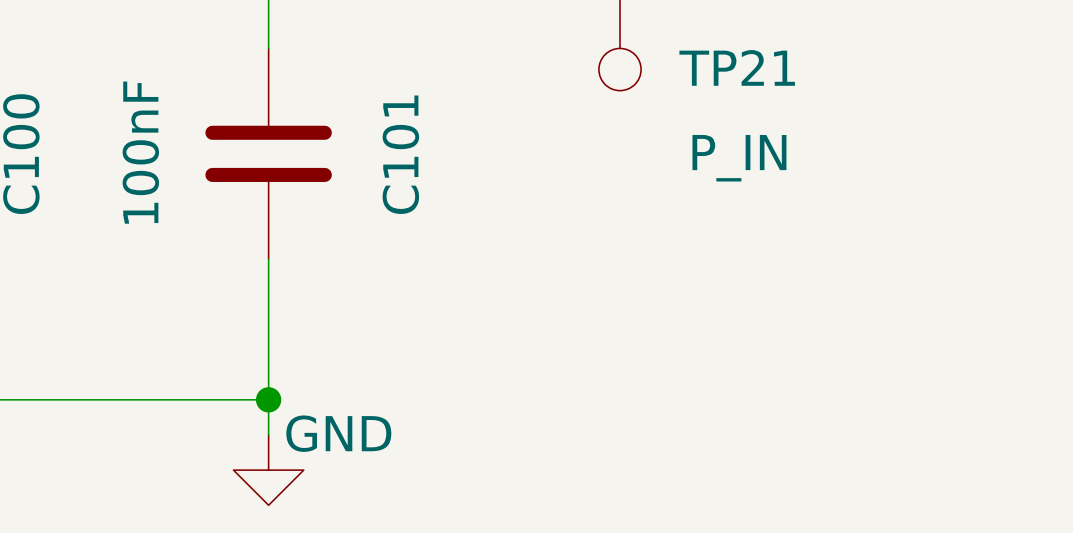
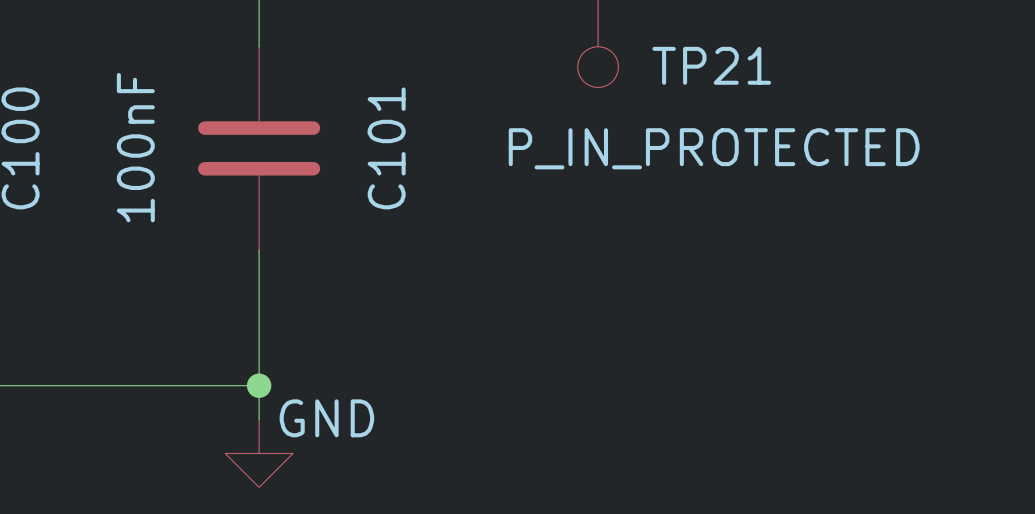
TP21 value: P_IN (739, 158) -> P_IN_PROTECTED (714, 148)

